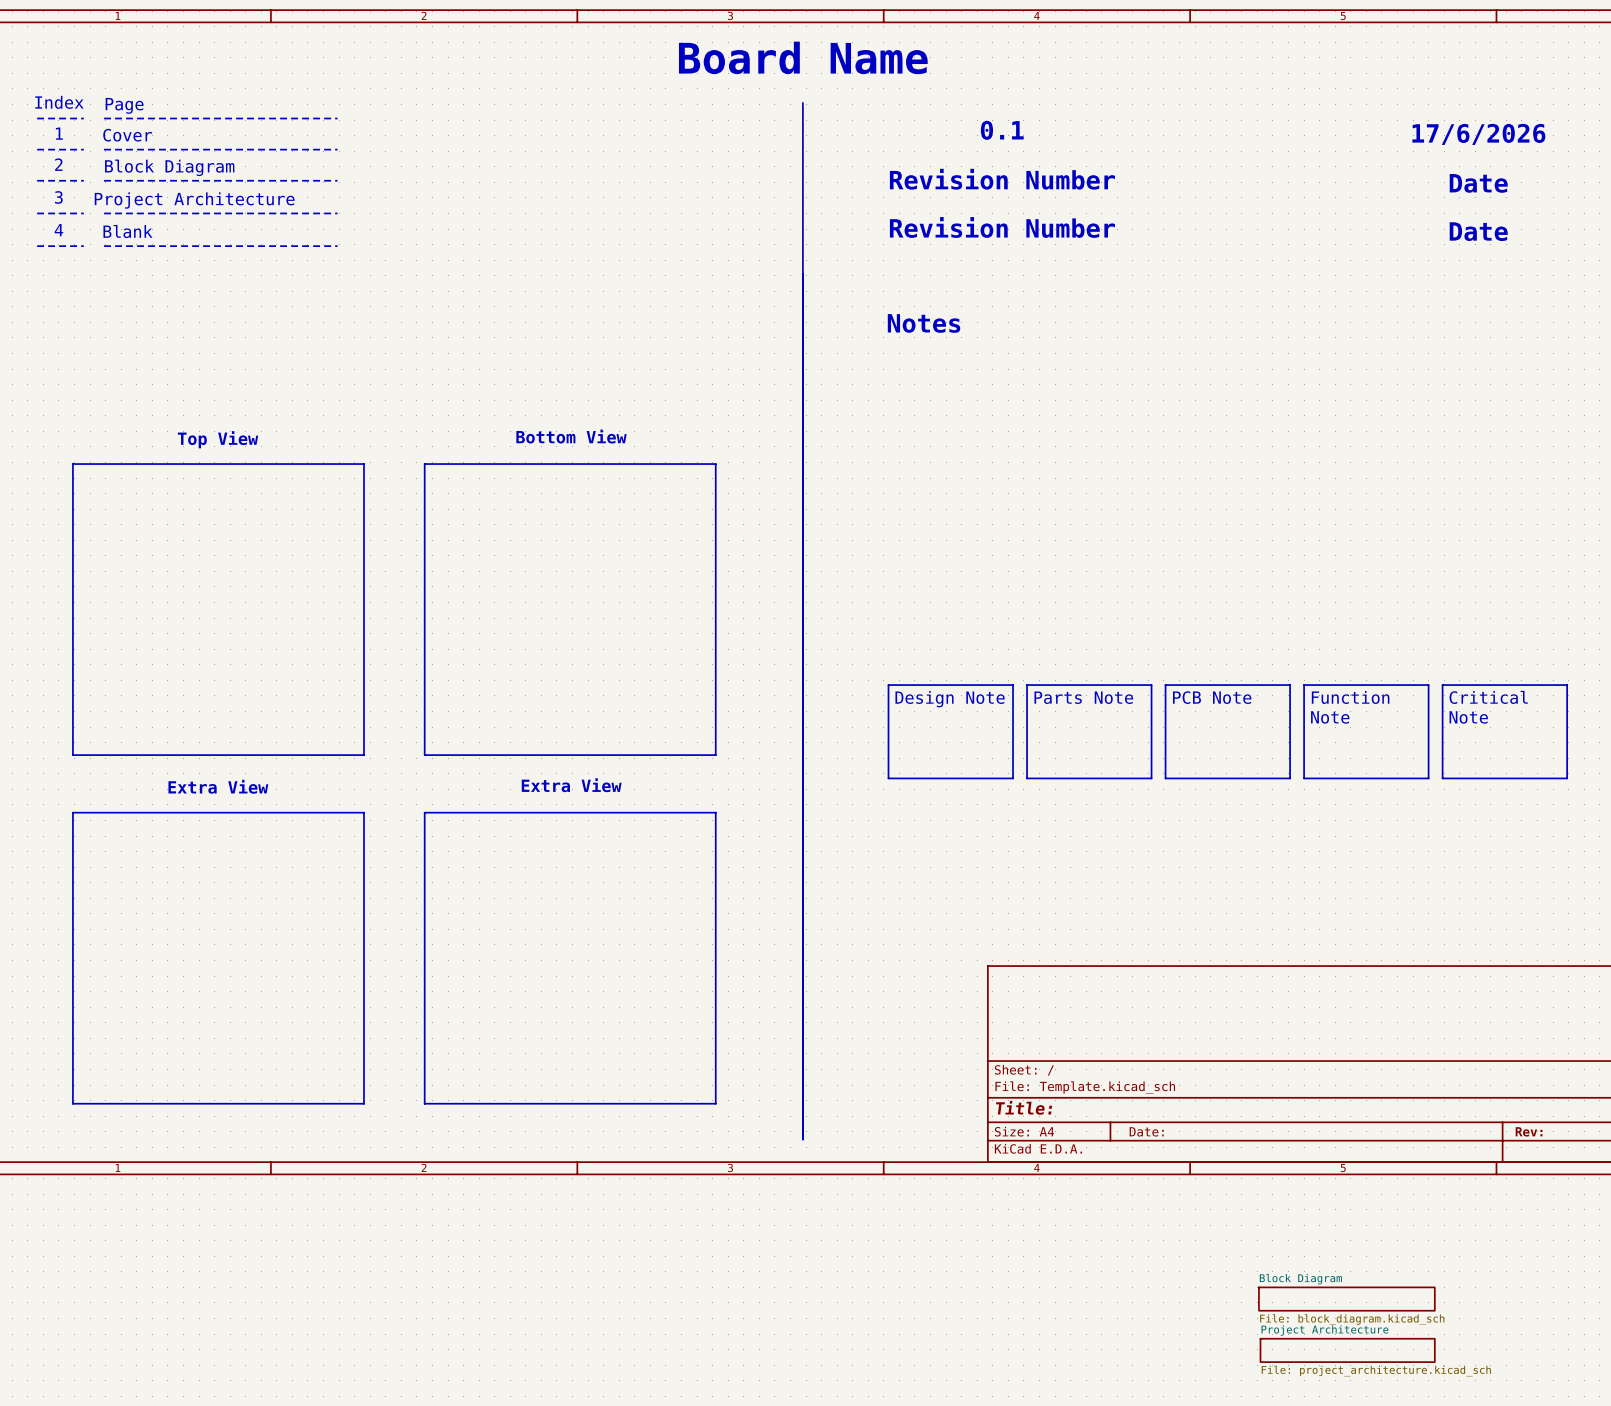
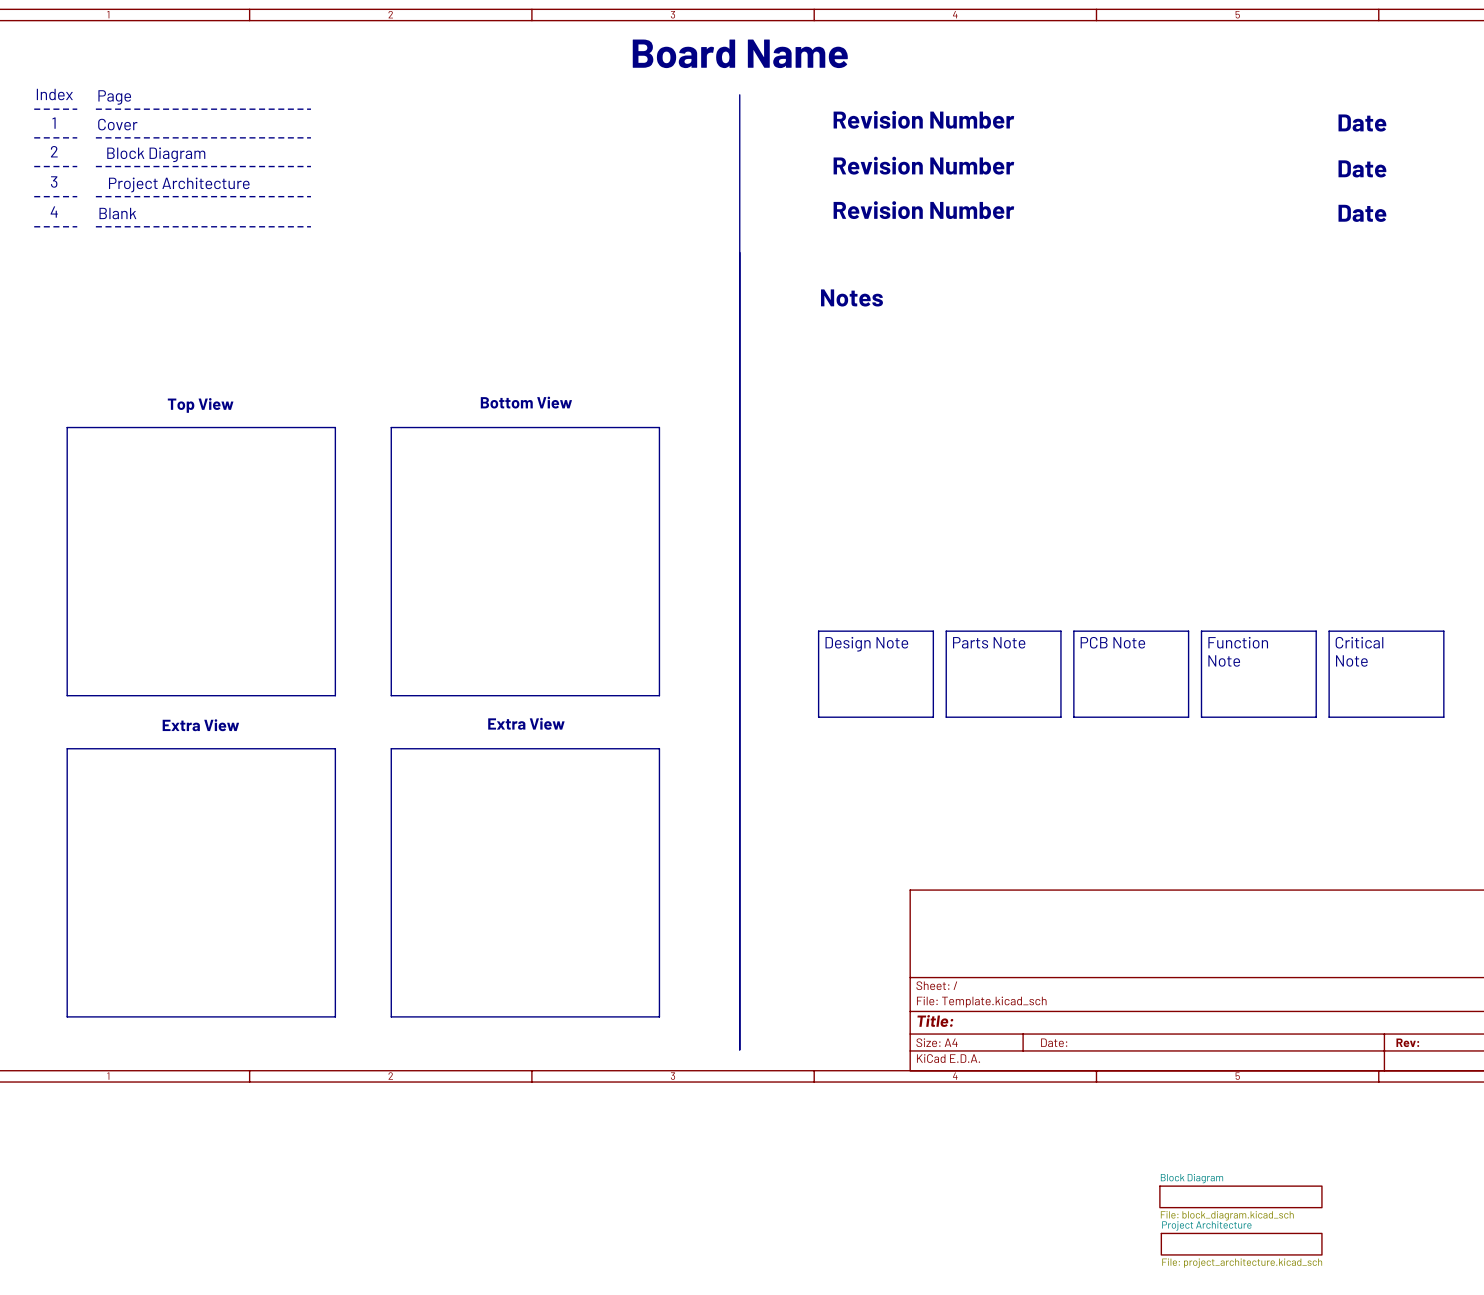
text: 0.1 (1002, 130) -> Revision Number (923, 119)
text: 17/6/2026 (1478, 134) -> Date (1362, 123)

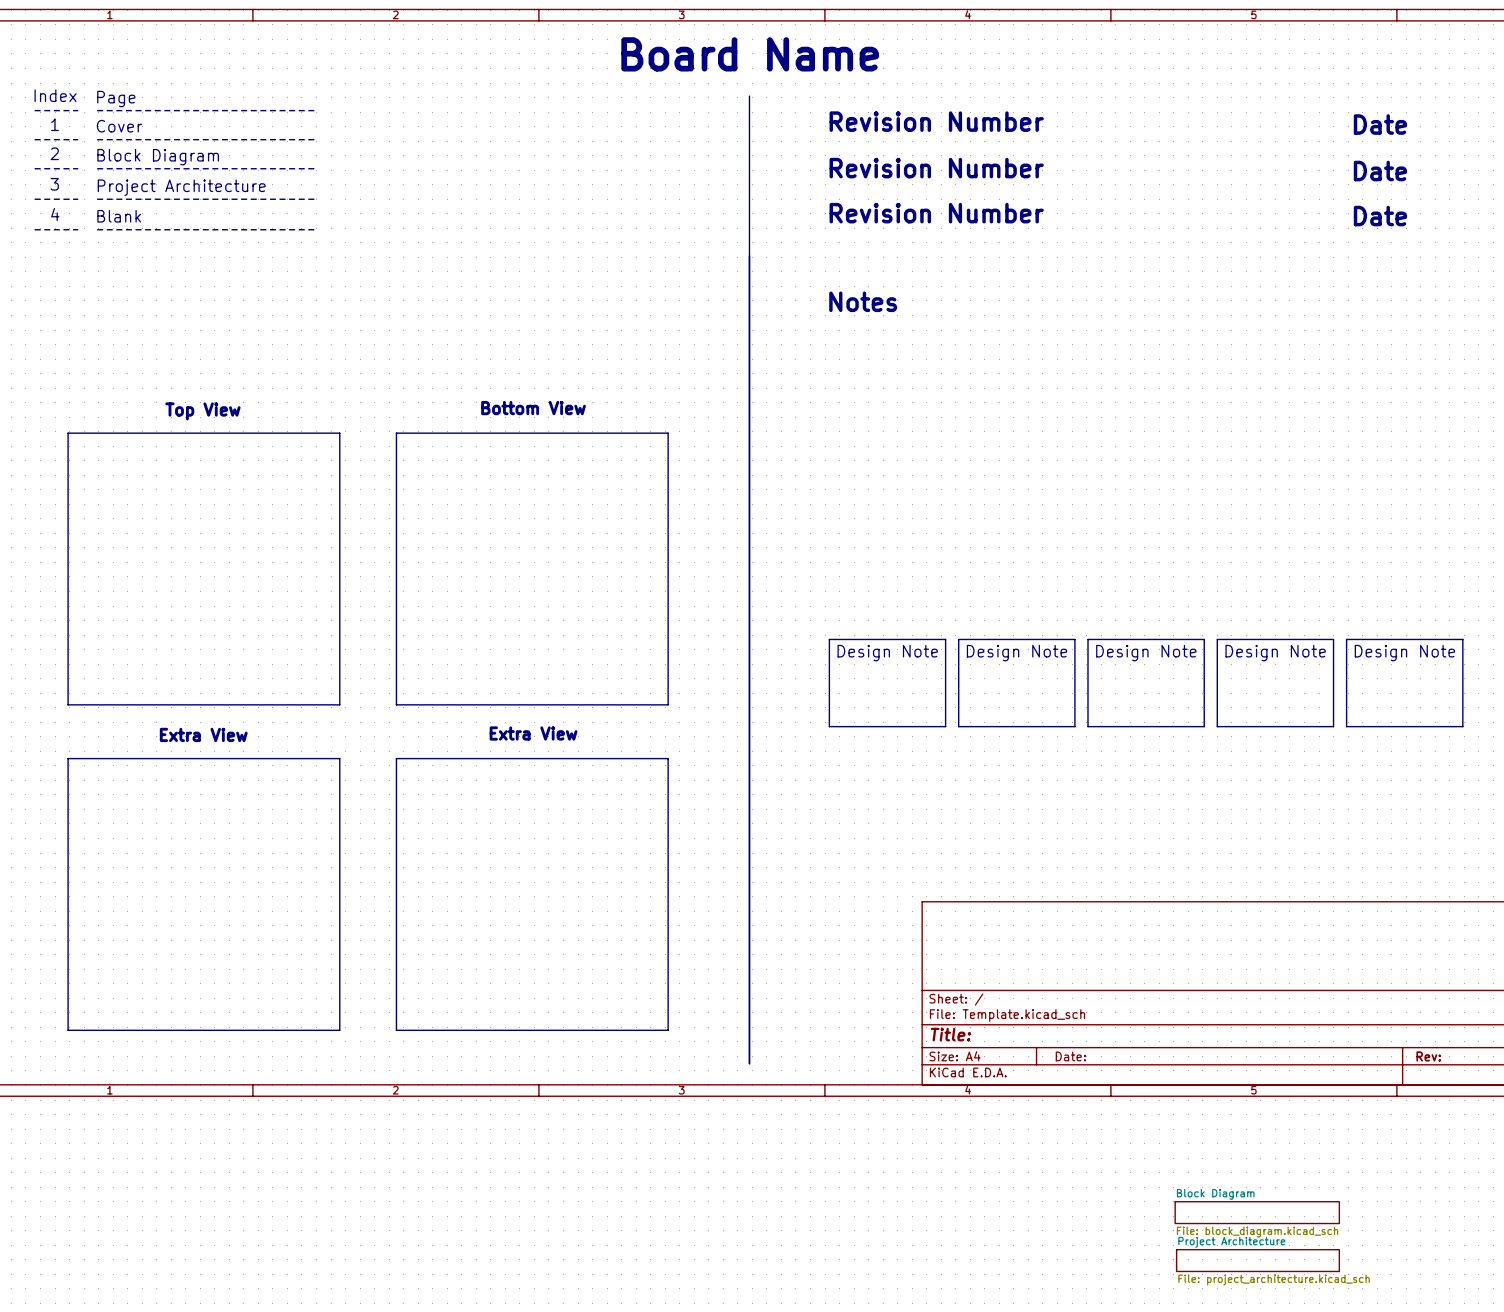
text: Parts Note (989, 642) -> Design Note (1017, 653)
text: PCB Note (1112, 642) -> Design Note (1146, 653)
text: Function (1238, 642) -> Design Note (1275, 653)
text: Critical (1359, 642) -> Design Note (1404, 653)
text: Note (1224, 660) -> none
text: Note (1351, 660) -> none

